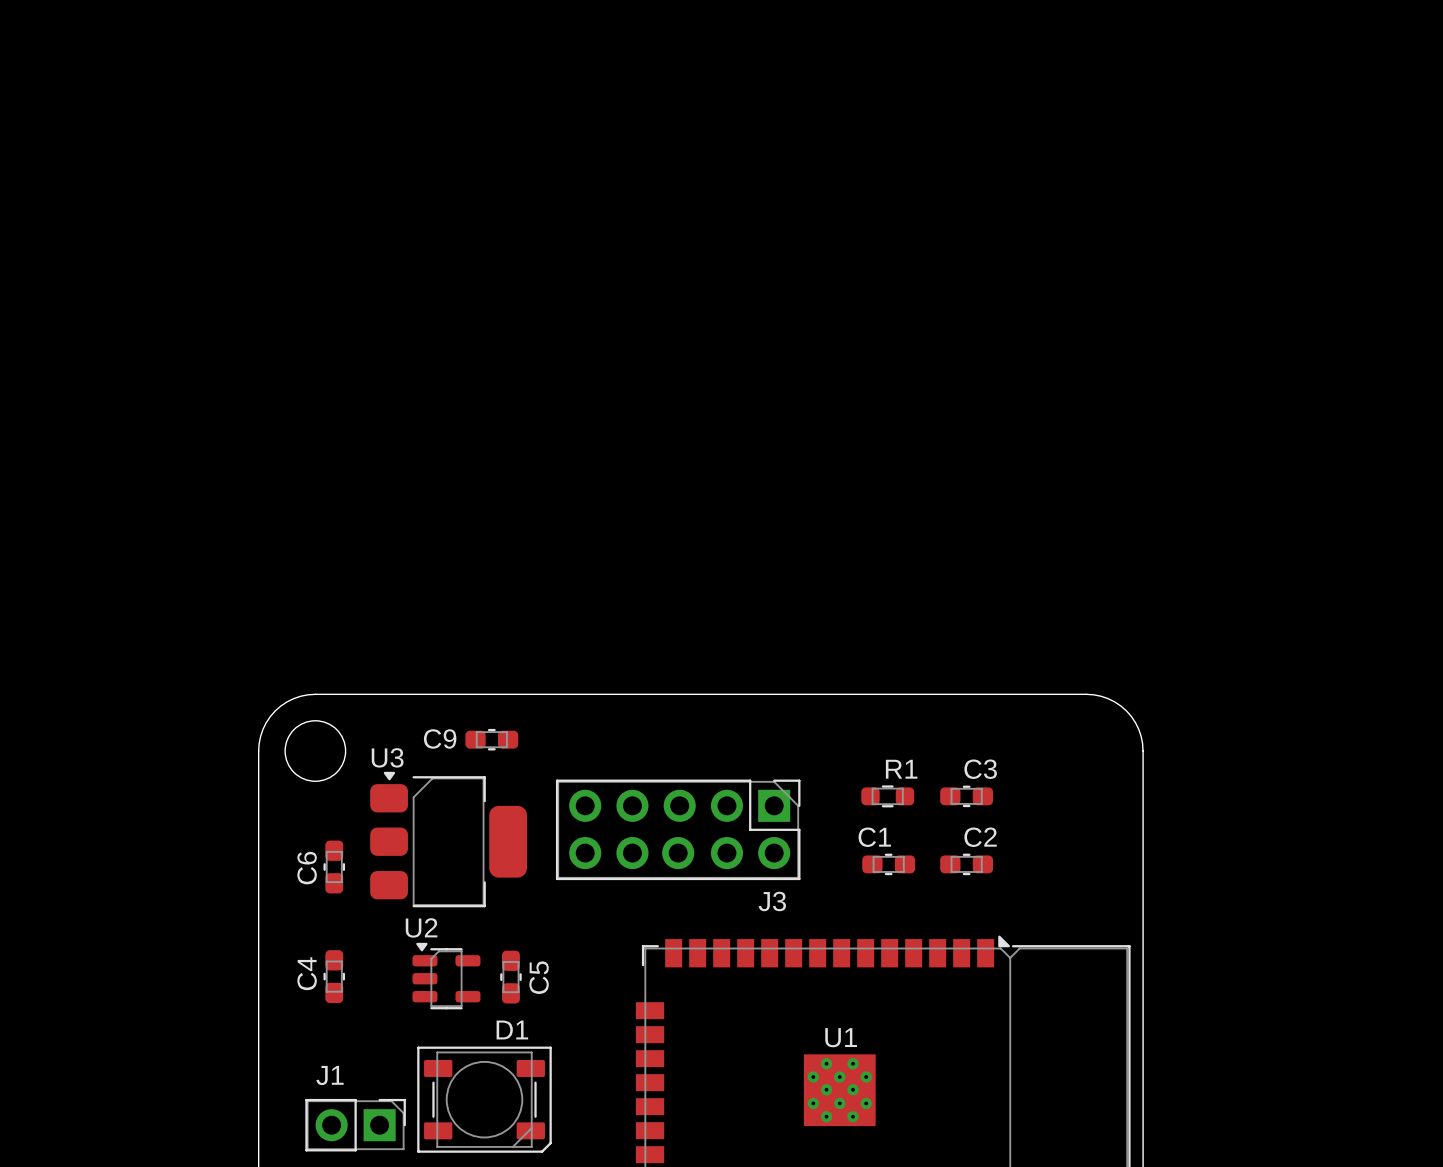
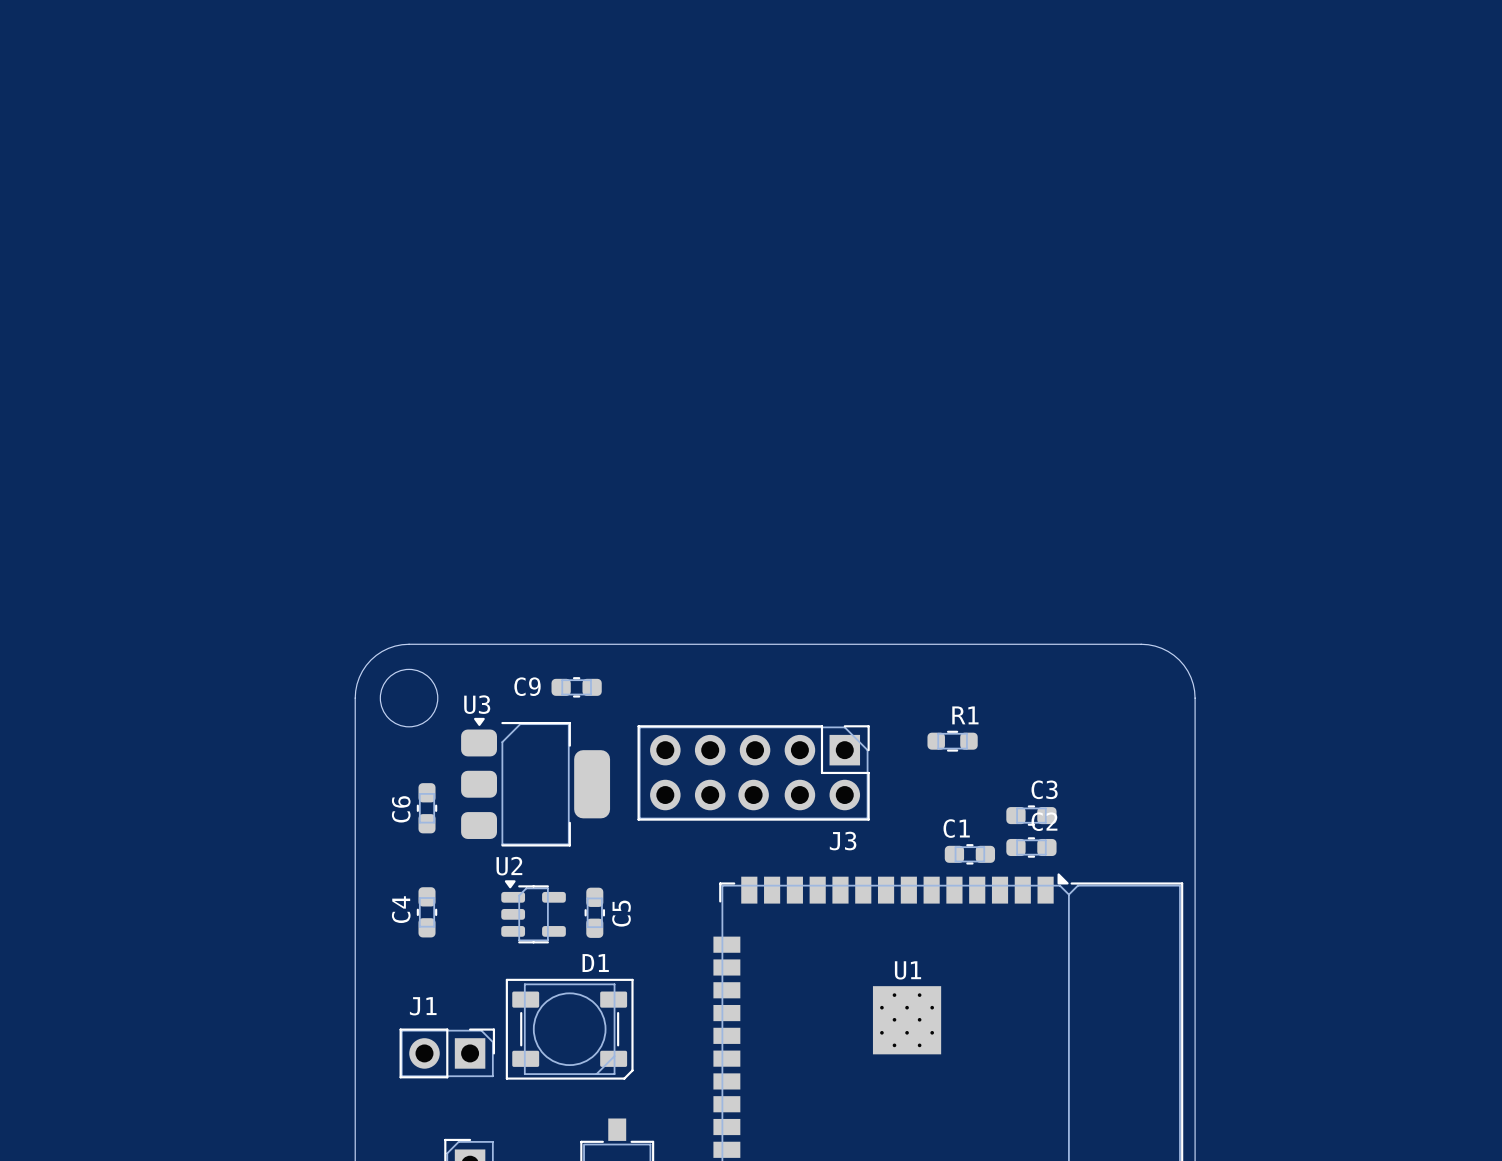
C3 position: (966, 796) -> (1031, 815)
C1 position: (888, 864) -> (969, 854)
C2 position: (966, 864) -> (1031, 847)

